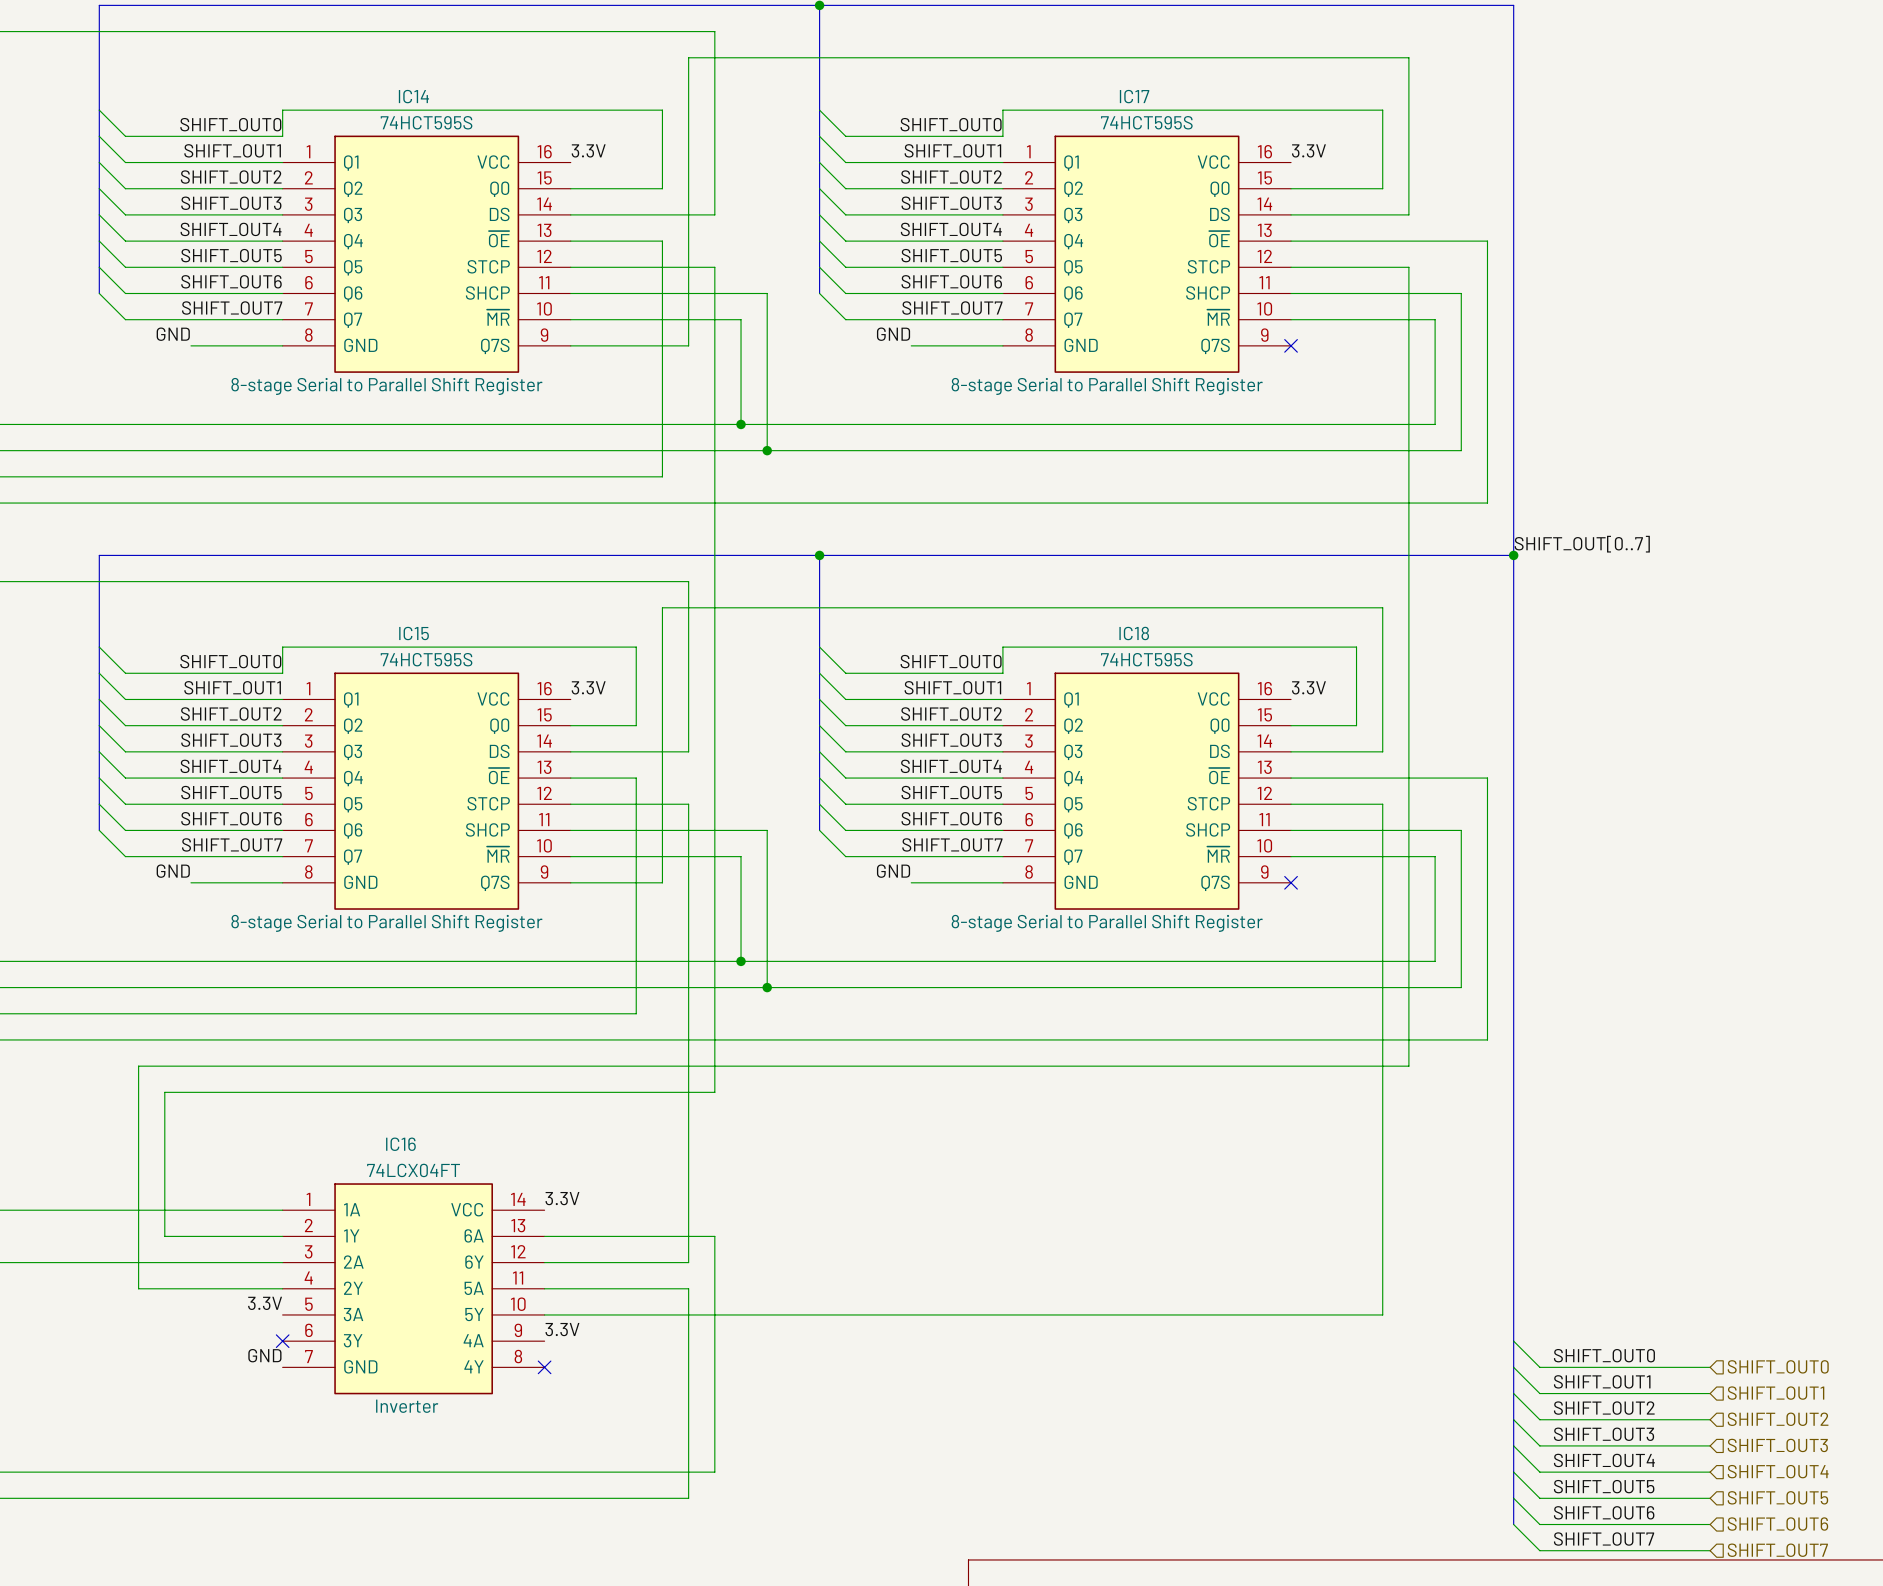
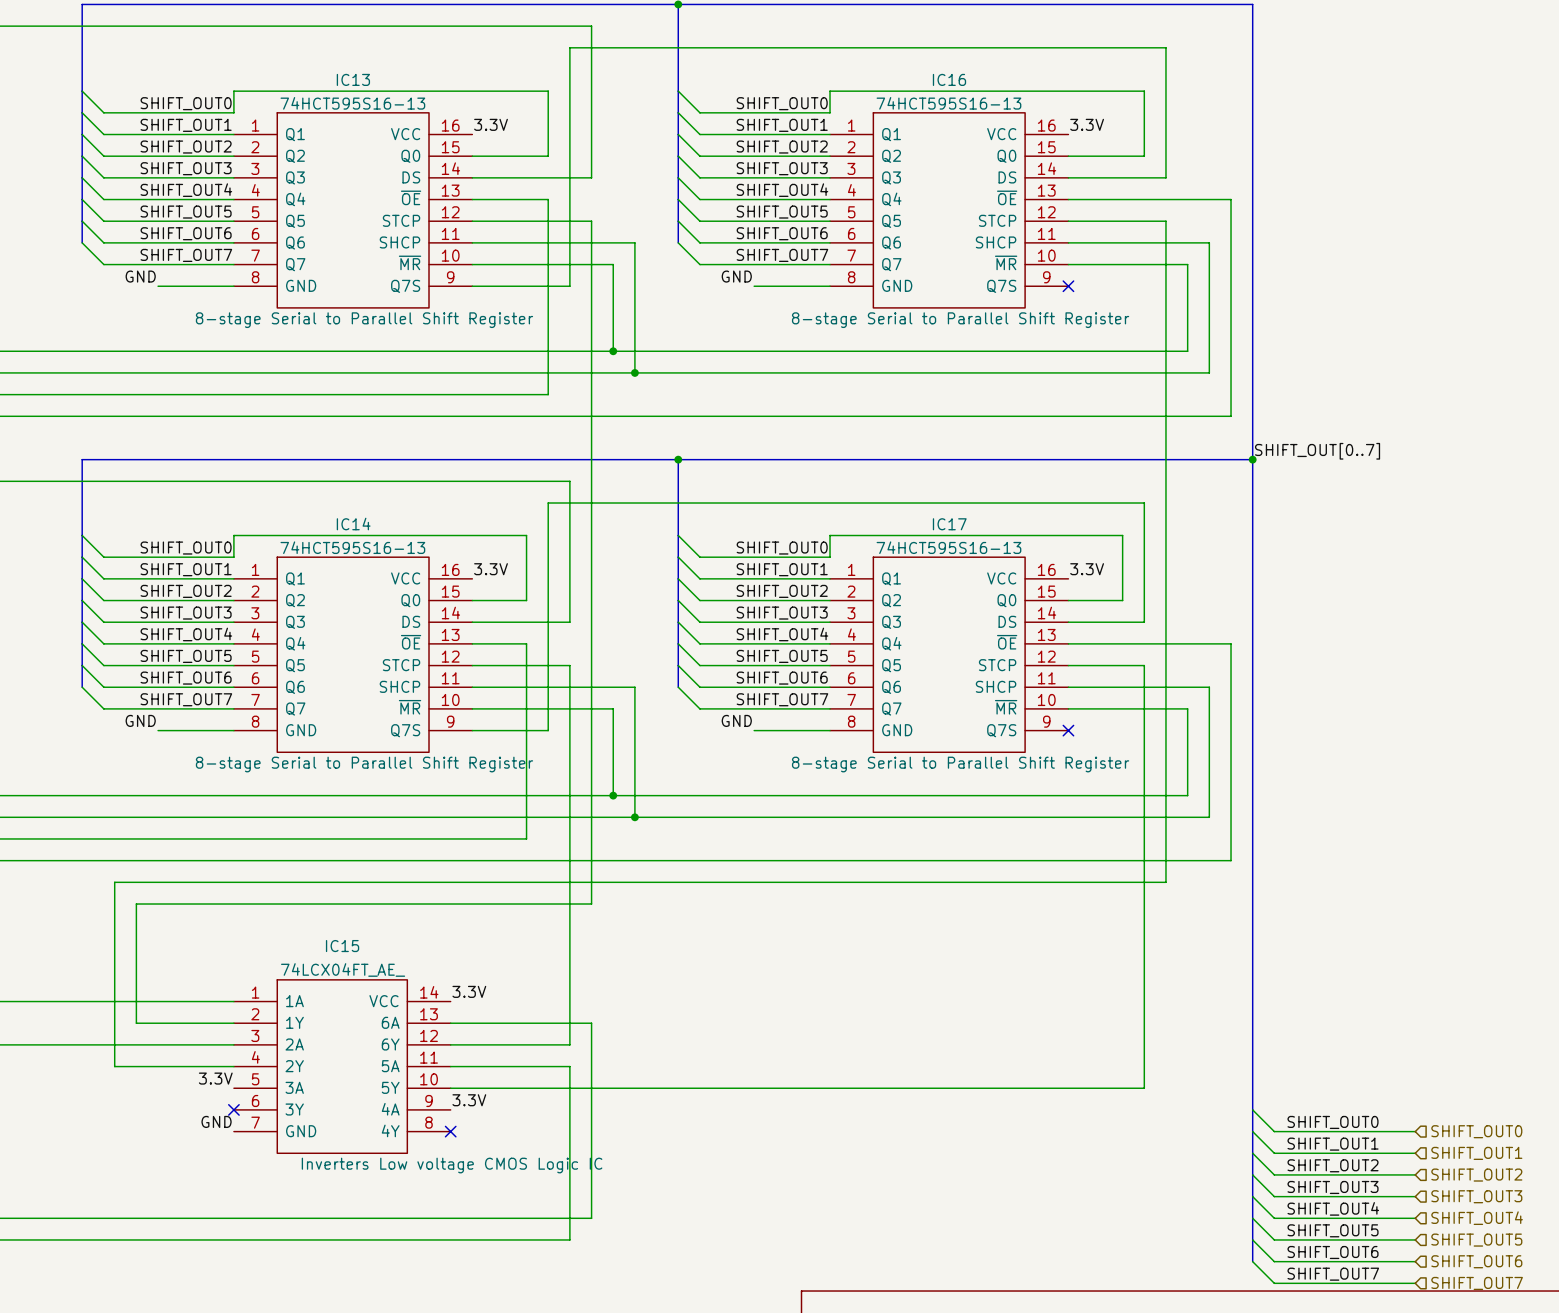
IC14 text: 74HCT595S (426, 122) -> none
IC17 text: 74HCT595S (1146, 122) -> none
IC16 value: none -> 74HCT595S16-13 (948, 103)
IC14 symbol: [282, 135, 571, 373] -> [233, 556, 473, 753]
IC17 symbol: [1002, 135, 1292, 373] -> [830, 556, 1069, 753]
IC13: none -> 74HCT595S16-13 (353, 210)
IC14 text position: 8-stage Serial to Parallel Shift Register (386, 386) -> 8-stage Serial to Parallel Shift Register (364, 764)
IC17 text position: 8-stage Serial to Parallel Shift Register (1107, 386) -> 8-stage Serial to Parallel Shift Register (960, 764)
IC15 text: 74HCT595S (426, 659) -> none
IC14 value: none -> 74HCT595S16-13 (352, 547)
IC17 value: none -> 74HCT595S16-13 (948, 547)
IC15 symbol: [282, 672, 571, 910] -> [233, 979, 451, 1154]
IC18: (1146, 791) -> none
IC15 text: 8-stage Serial to Parallel Shift Register (386, 923) -> Inverters Low voltage CMOS Logic IC (452, 1165)
IC16 text: 74LCX04FT (413, 1170) -> none
IC15 value: none -> 74LCX04FT_AE_ (343, 969)
IC16 symbol: [282, 1183, 545, 1395] -> [830, 112, 1069, 309]
IC16 text: Inverter (407, 1406) -> 8-stage Serial to Parallel Shift Register (960, 320)

